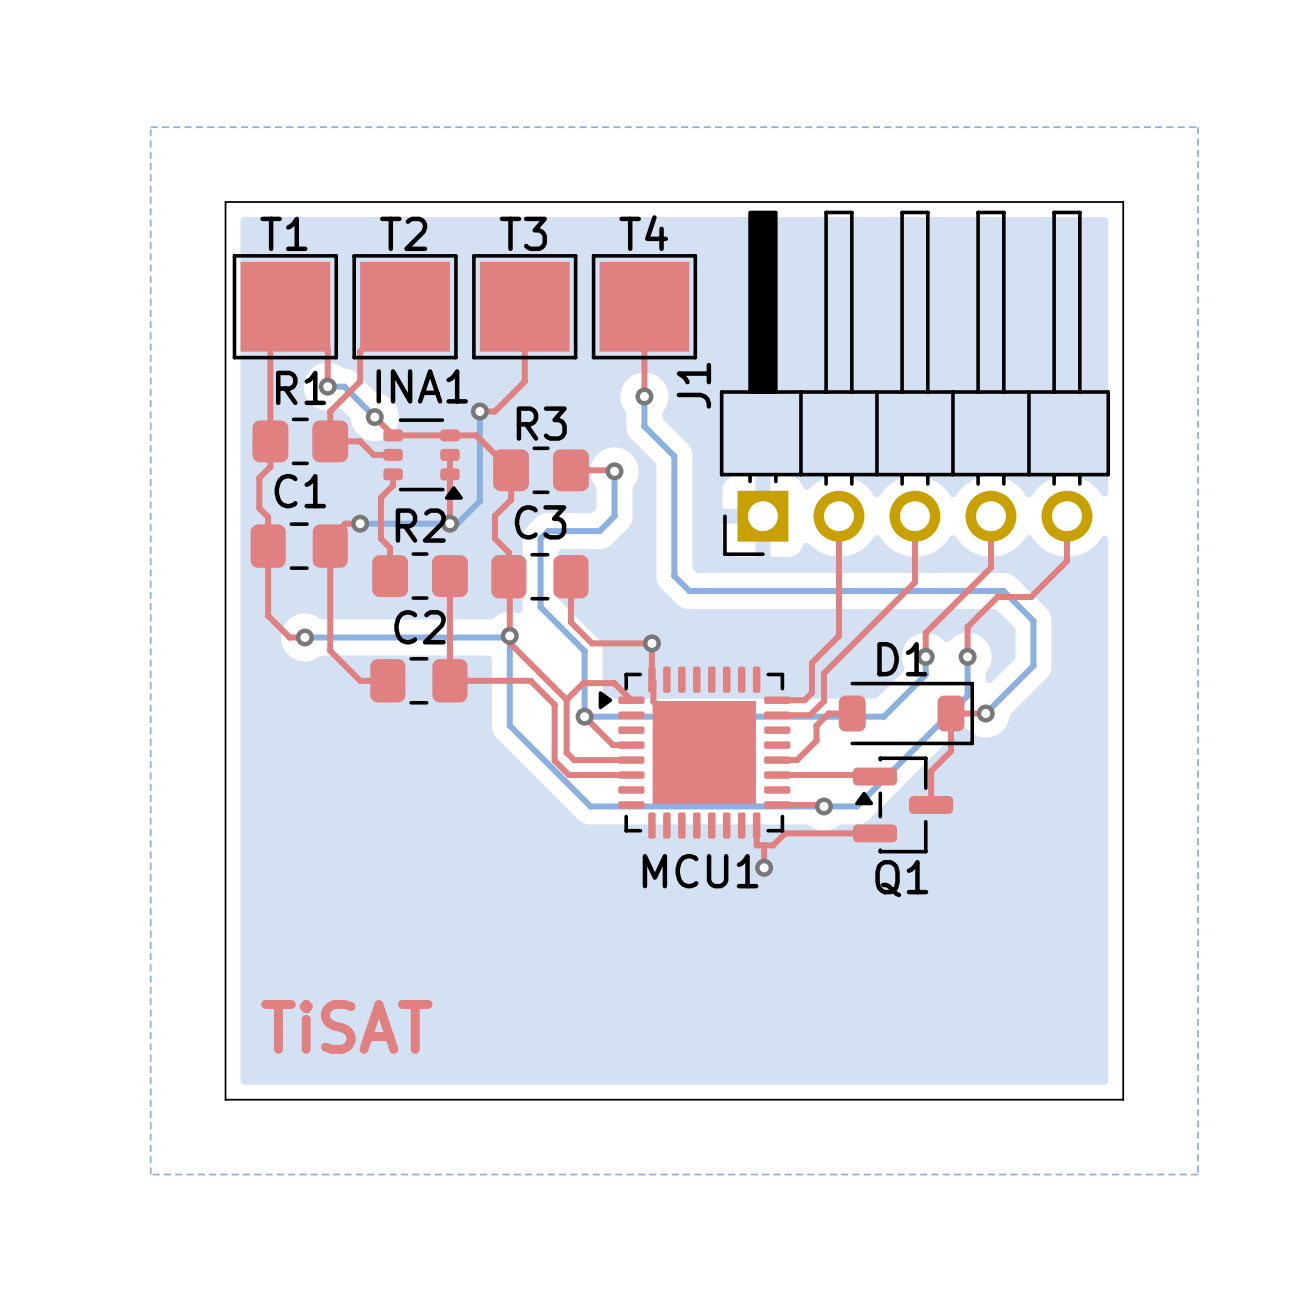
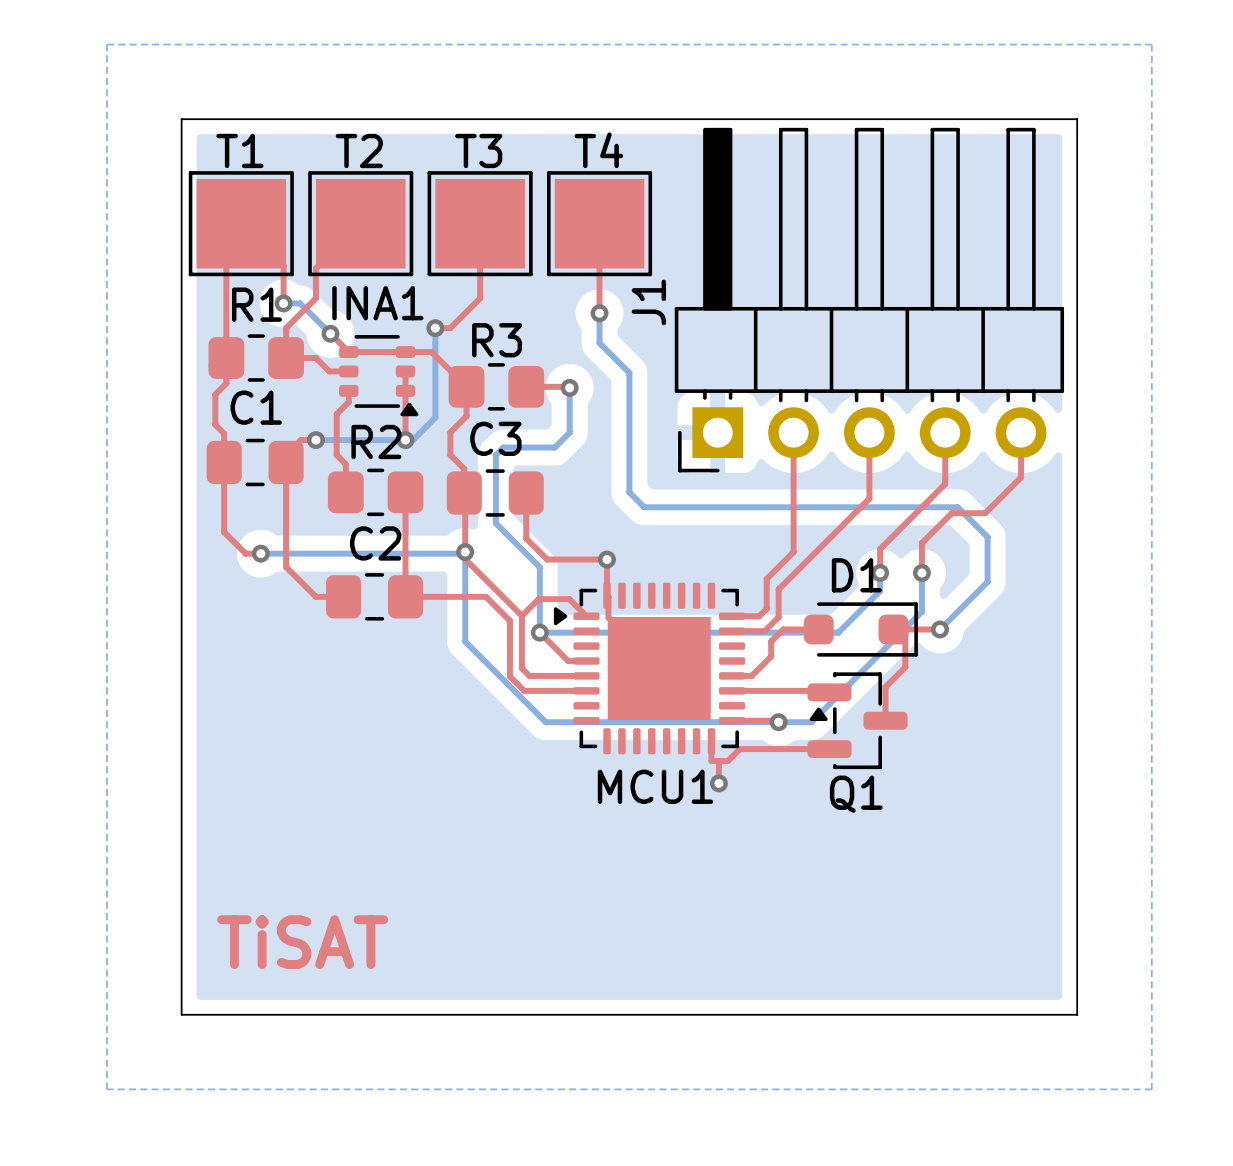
D1 footprint: [838, 681, 975, 746] -> [803, 602, 918, 657]

